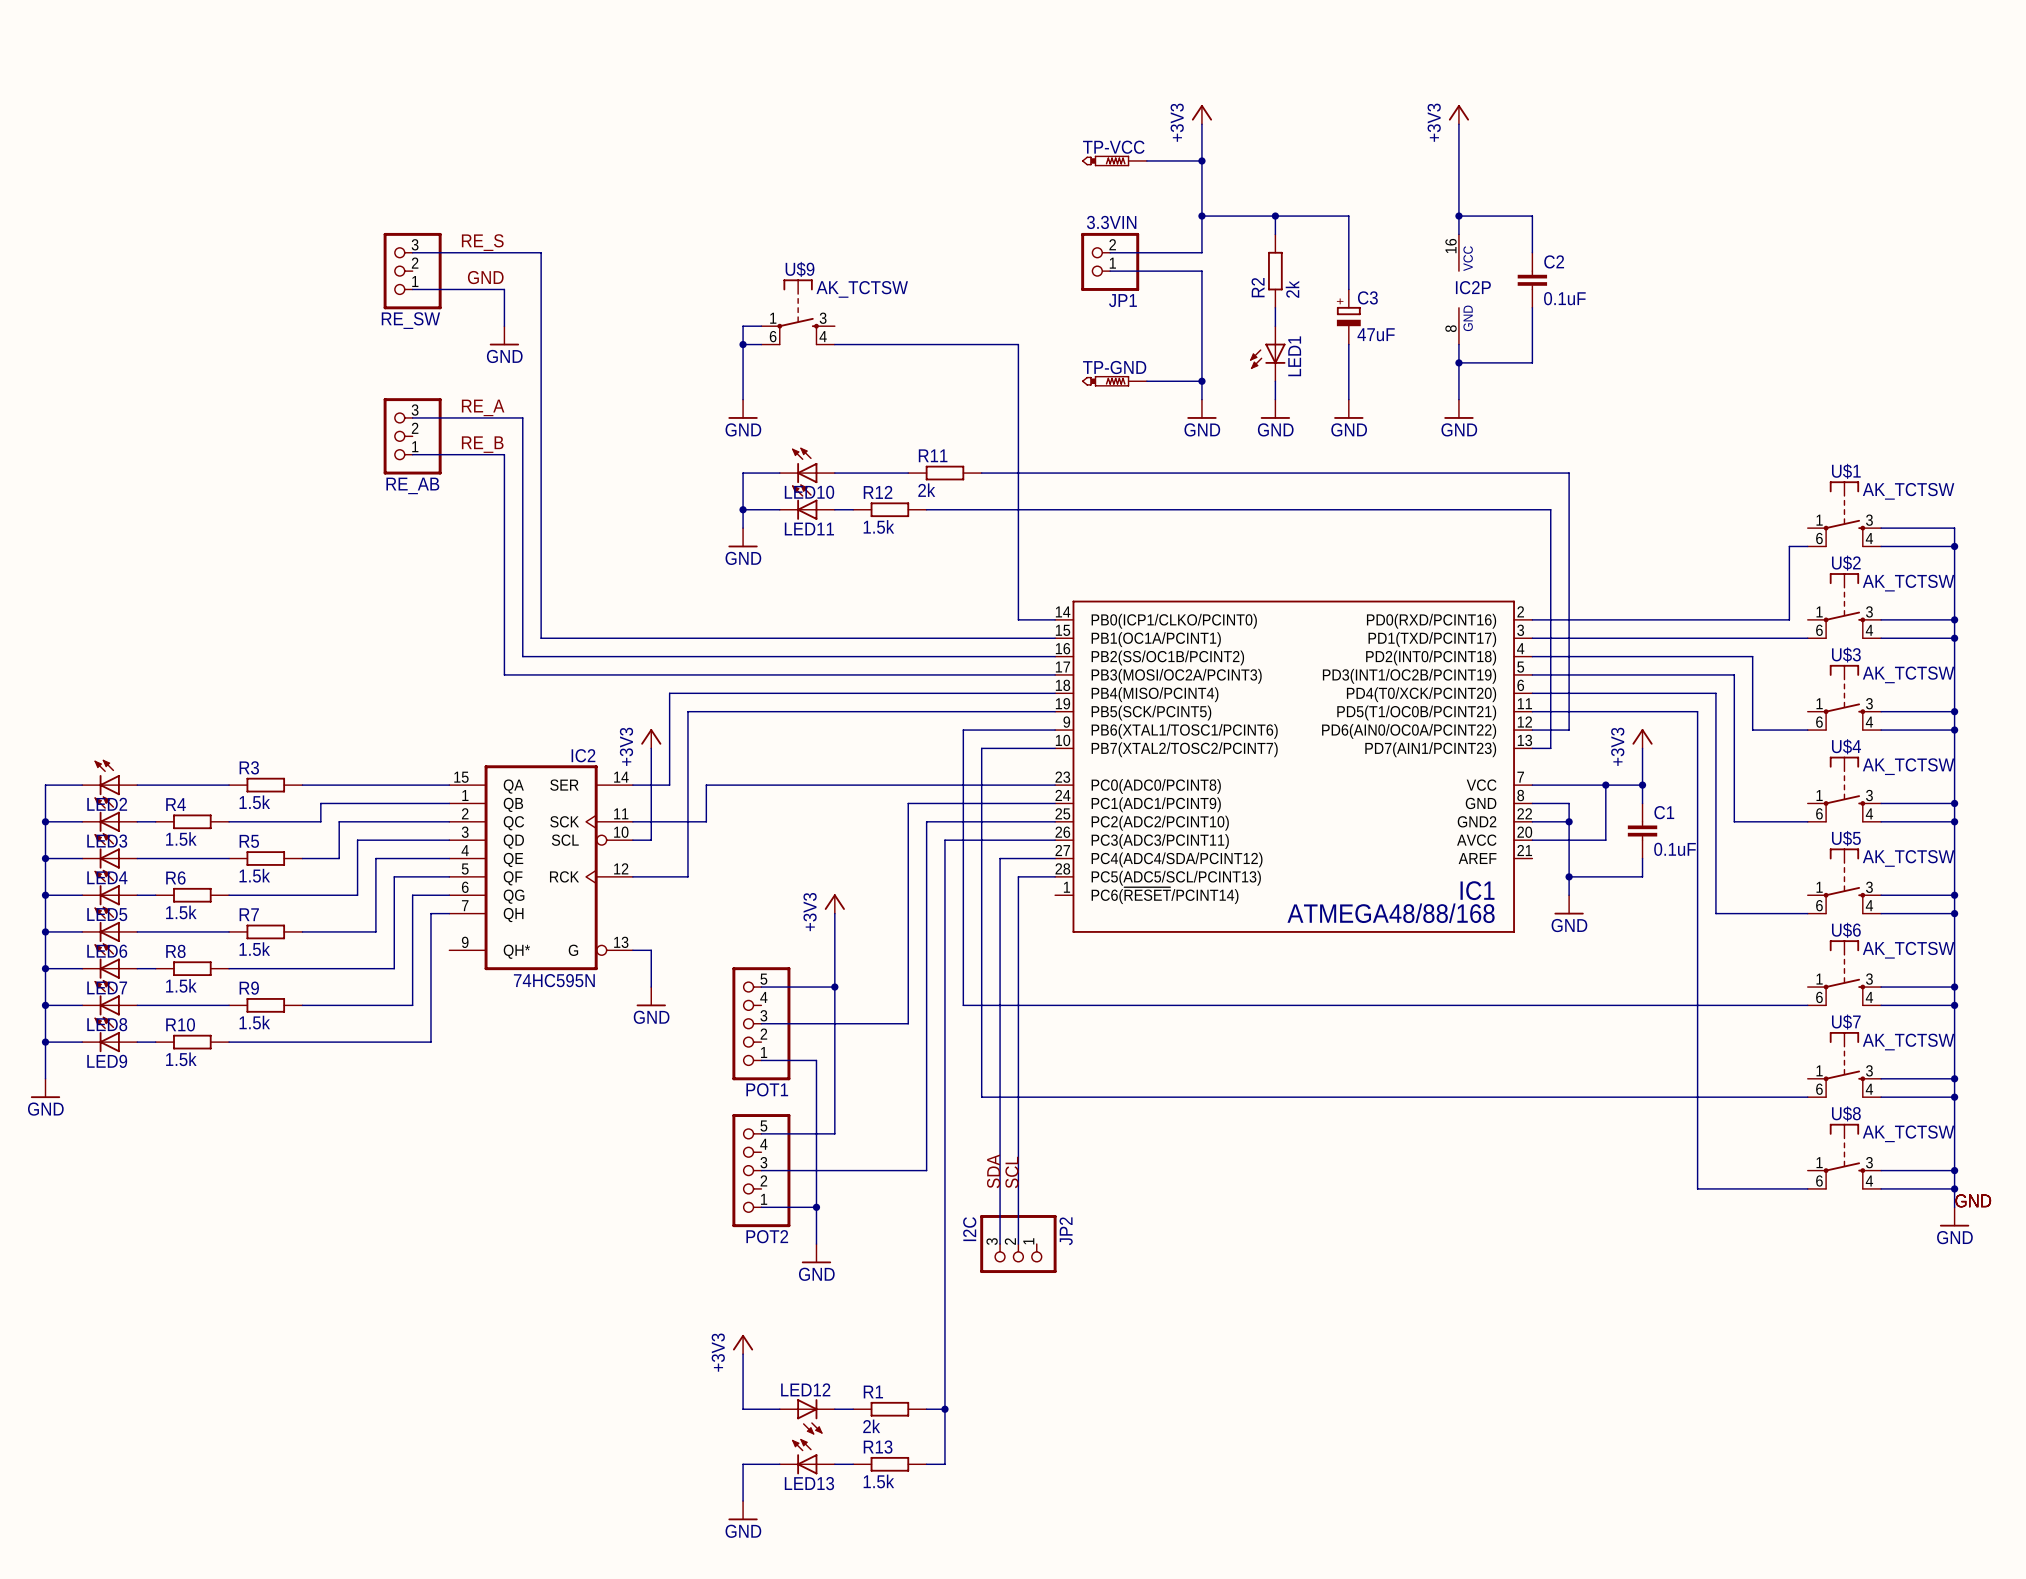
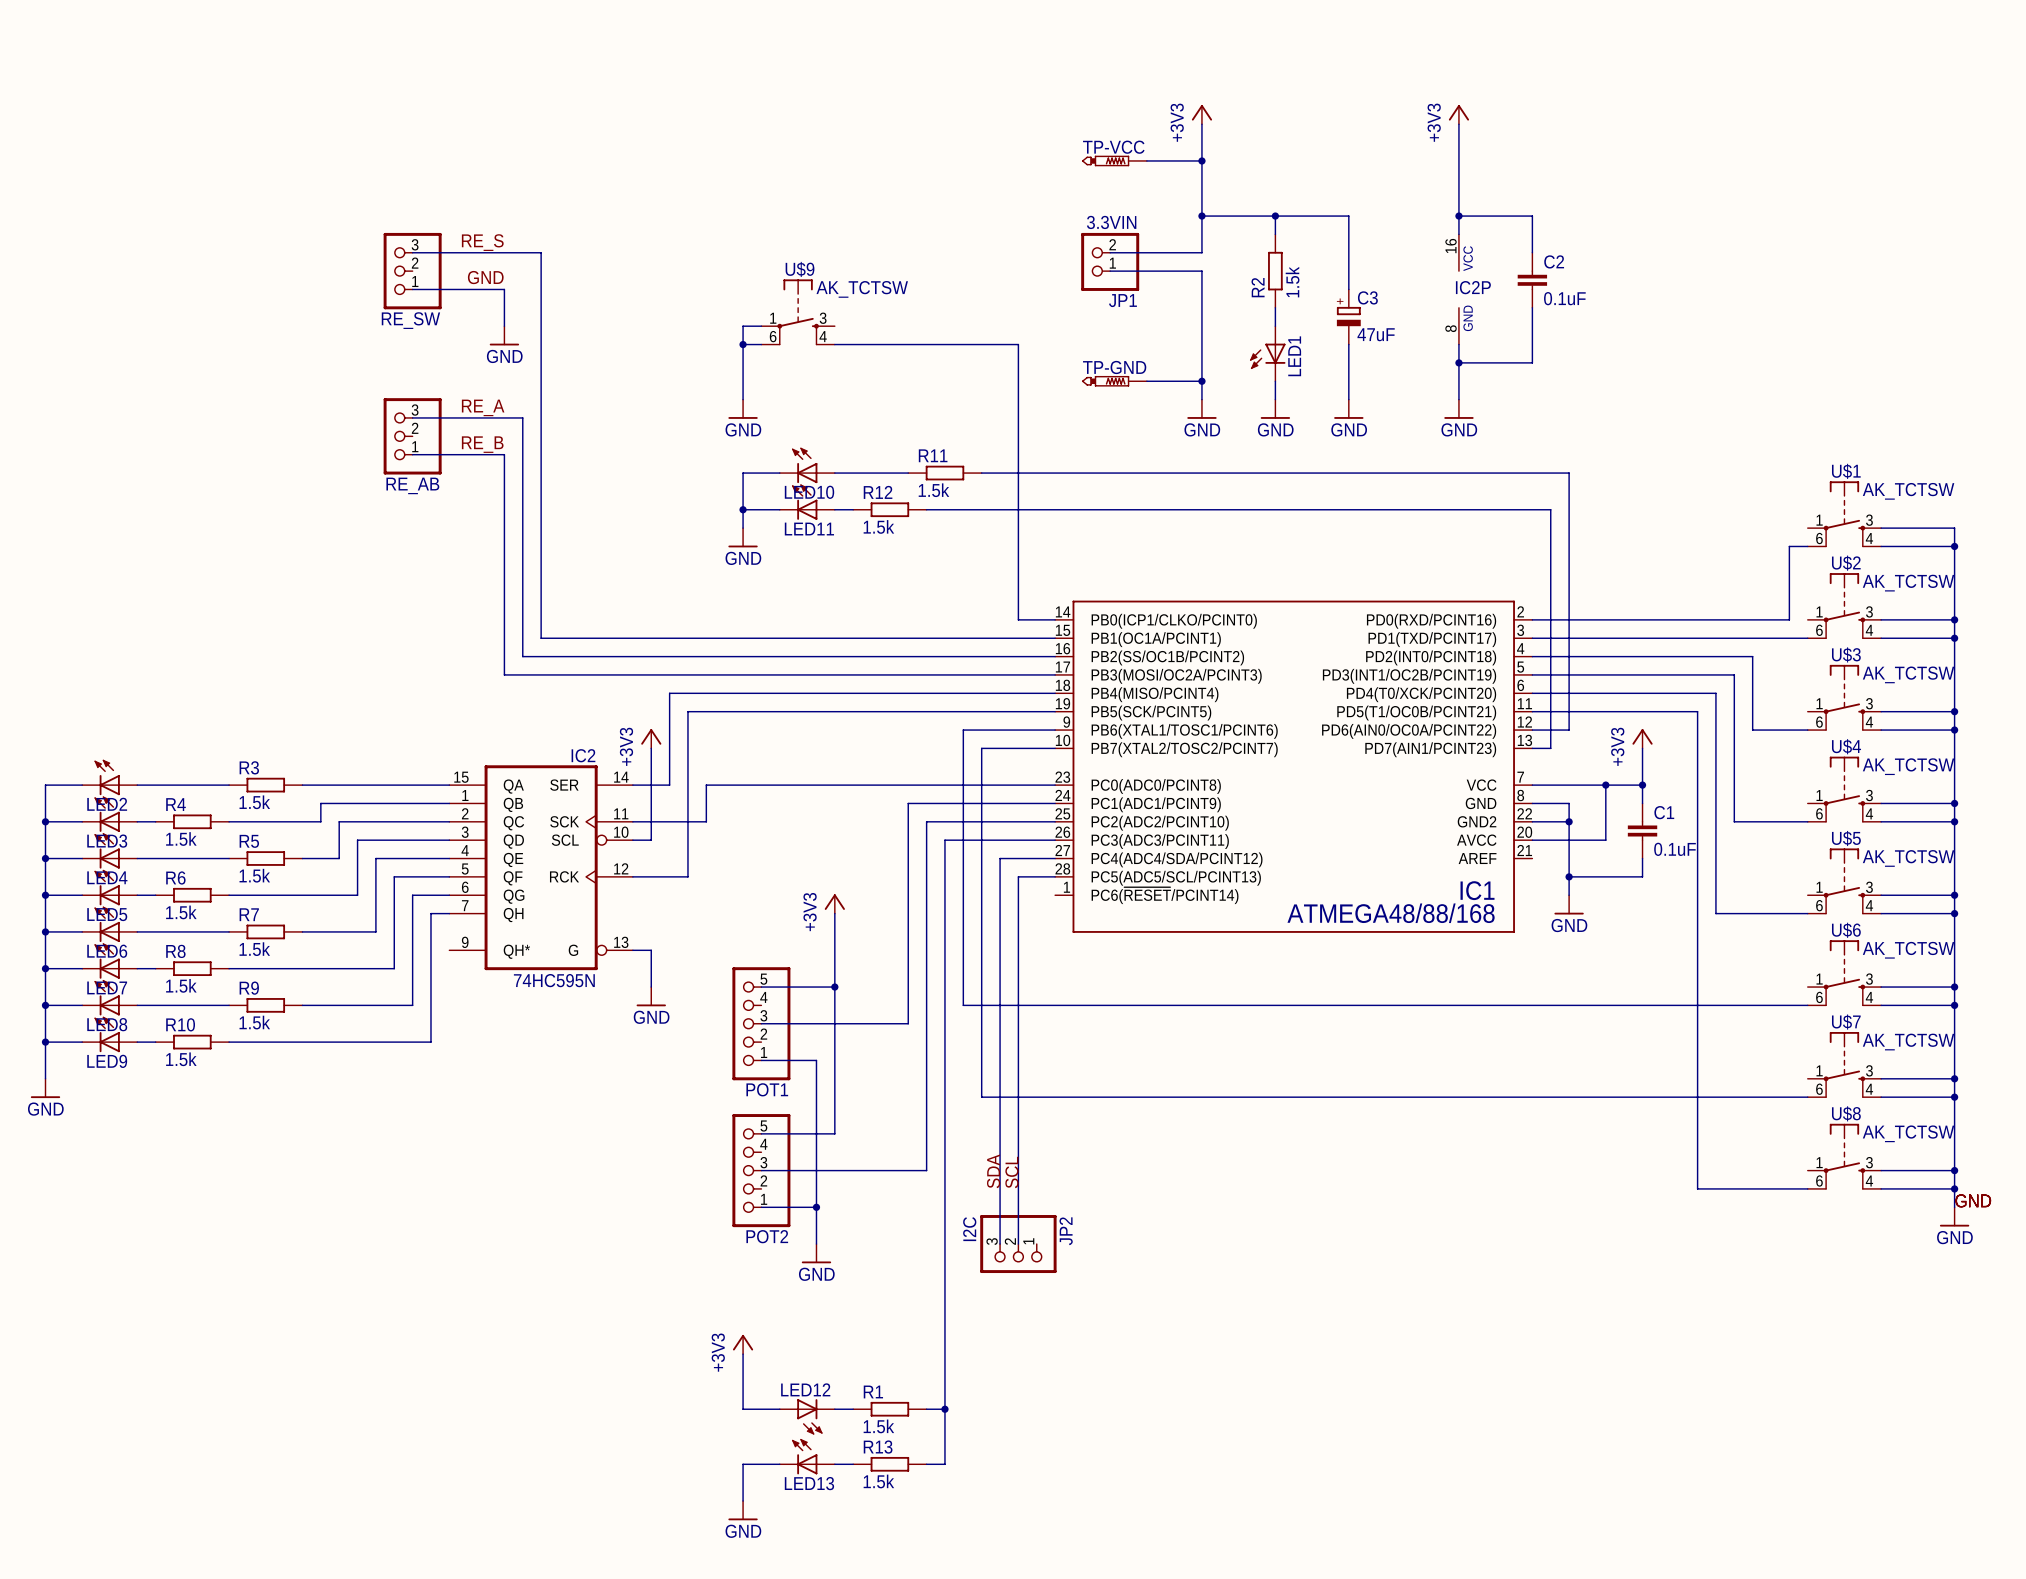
R2 value: 2k (1292, 289) -> 1.5k (1292, 282)
R11 value: 2k (926, 490) -> 1.5k (933, 490)
R1 value: 2k (871, 1426) -> 1.5k (878, 1426)

